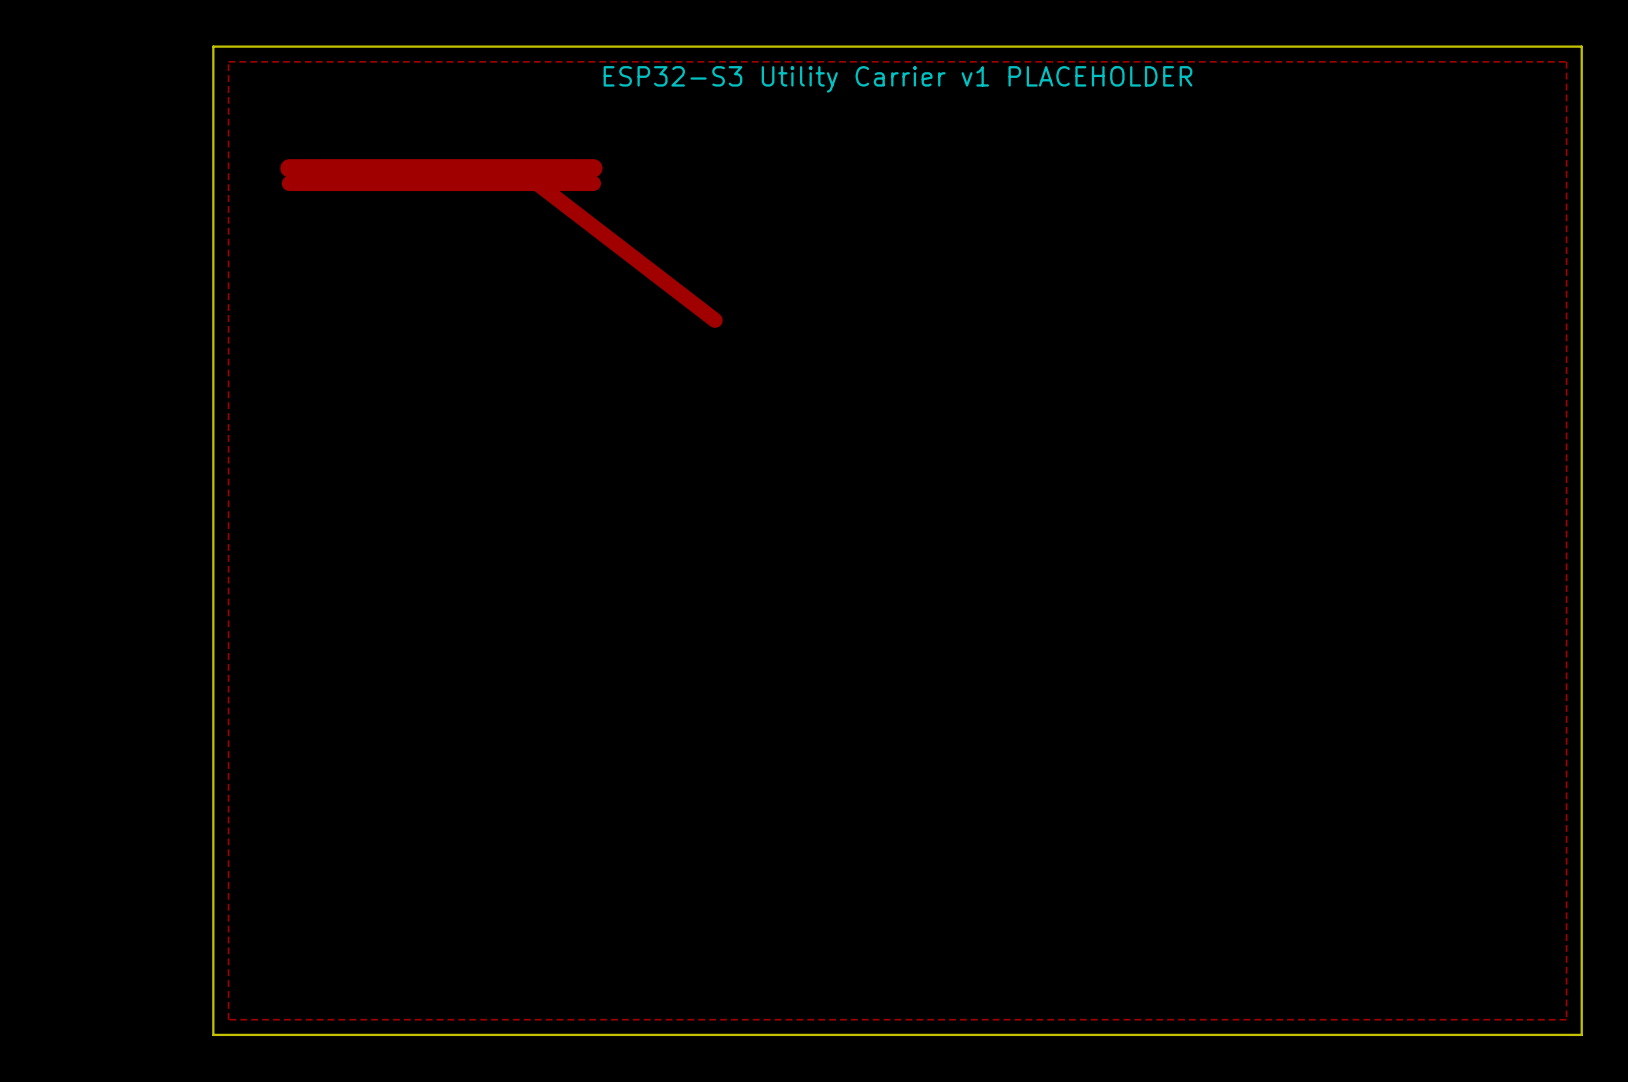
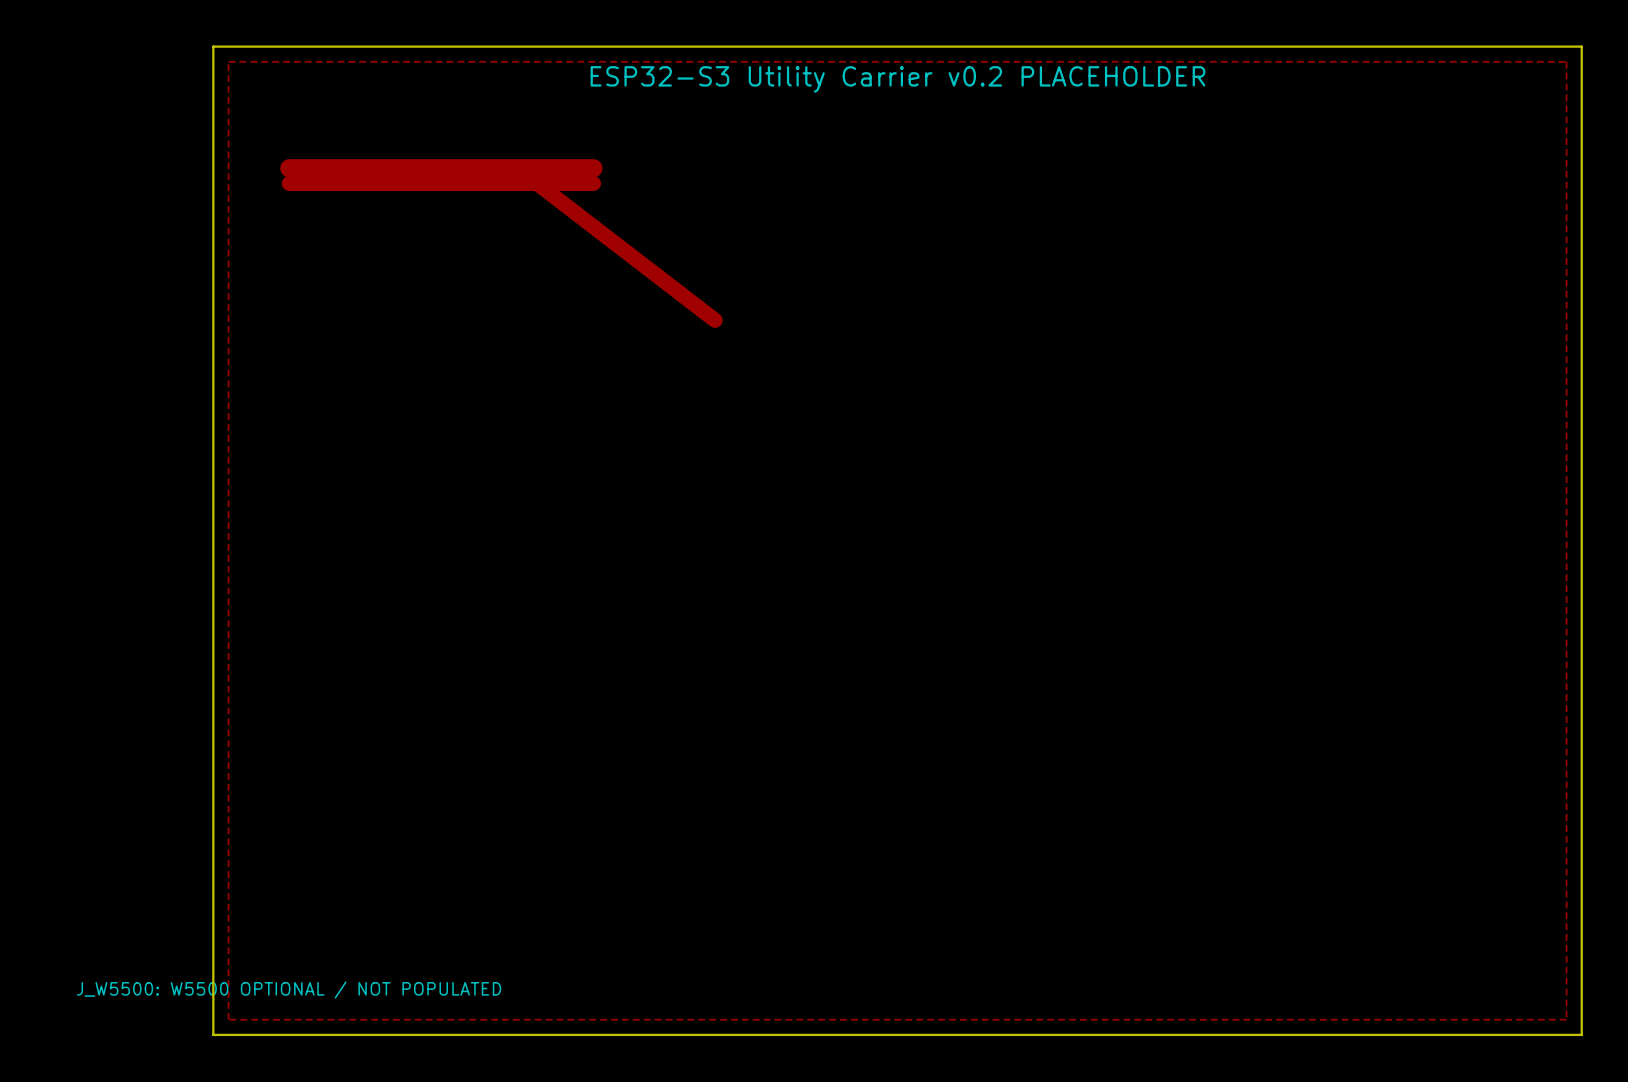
text: ESP32-S3 Utility Carrier v1 PLACEHOLDER (897, 79) -> ESP32-S3 Utility Carrier v0.2 PLACEHOLDER (897, 79)
text: none -> J_W5500: W5500 OPTIONAL / NOT POPULATED (289, 990)

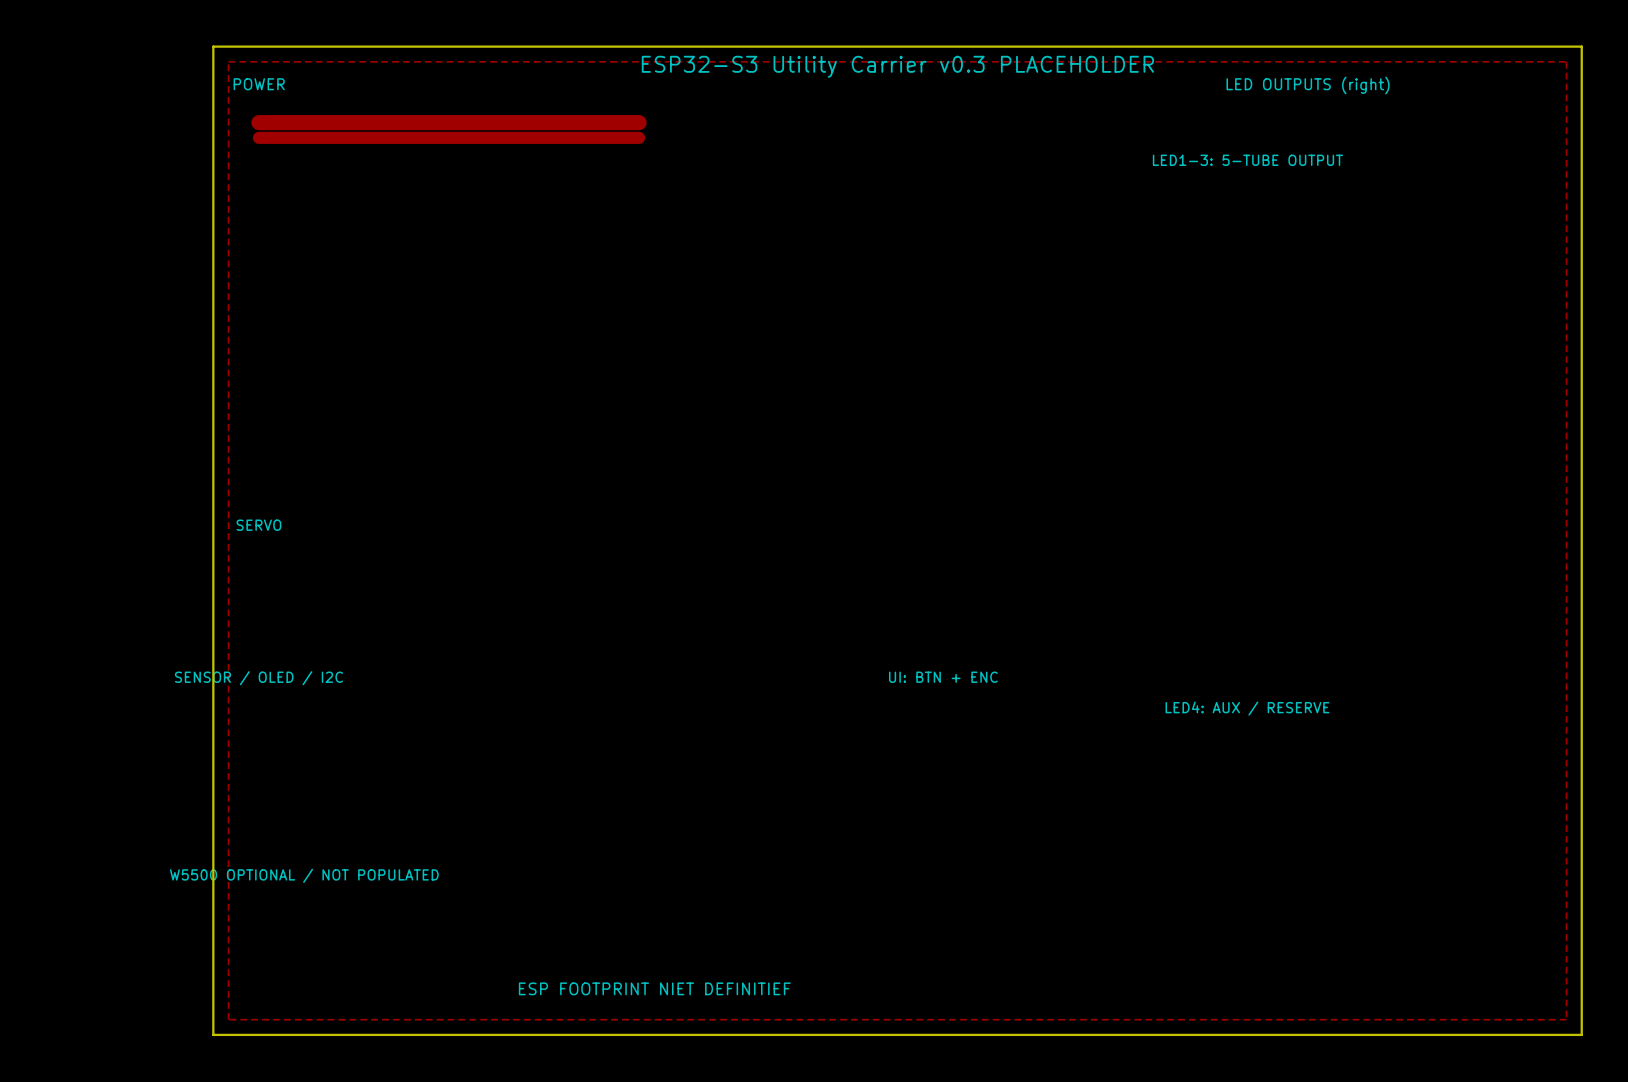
text: ESP32-S3 Utility Carrier v0.2 PLACEHOLDER (897, 79) -> ESP32-S3 Utility Carrier v0.3 PLACEHOLDER (897, 66)
text: none -> POWER (259, 84)
text: none -> LED OUTPUTS (right) (1308, 85)
track: none -> (258, 122) (639, 122)
track: none -> (258, 137) (639, 137)
text: none -> LED1-3: 5-TUBE OUTPUT (1247, 160)
track: (289, 168) (593, 168) -> none
track: (517, 168) (715, 320) -> none
track: (289, 183) (593, 183) -> none
text: none -> SERVO (258, 525)
text: none -> UI: BTN + ENC (943, 677)
text: none -> SENSOR / OLED / I2C (258, 678)
text: none -> LED4: AUX / RESERVE (1247, 708)
text: none -> W5500 OPTIONAL / NOT POPULATED (304, 875)
text: none -> ESP FOOTPRINT NIET DEFINITIEF (654, 988)
text: J_W5500: W5500 OPTIONAL / NOT POPULATED (289, 990) -> none

